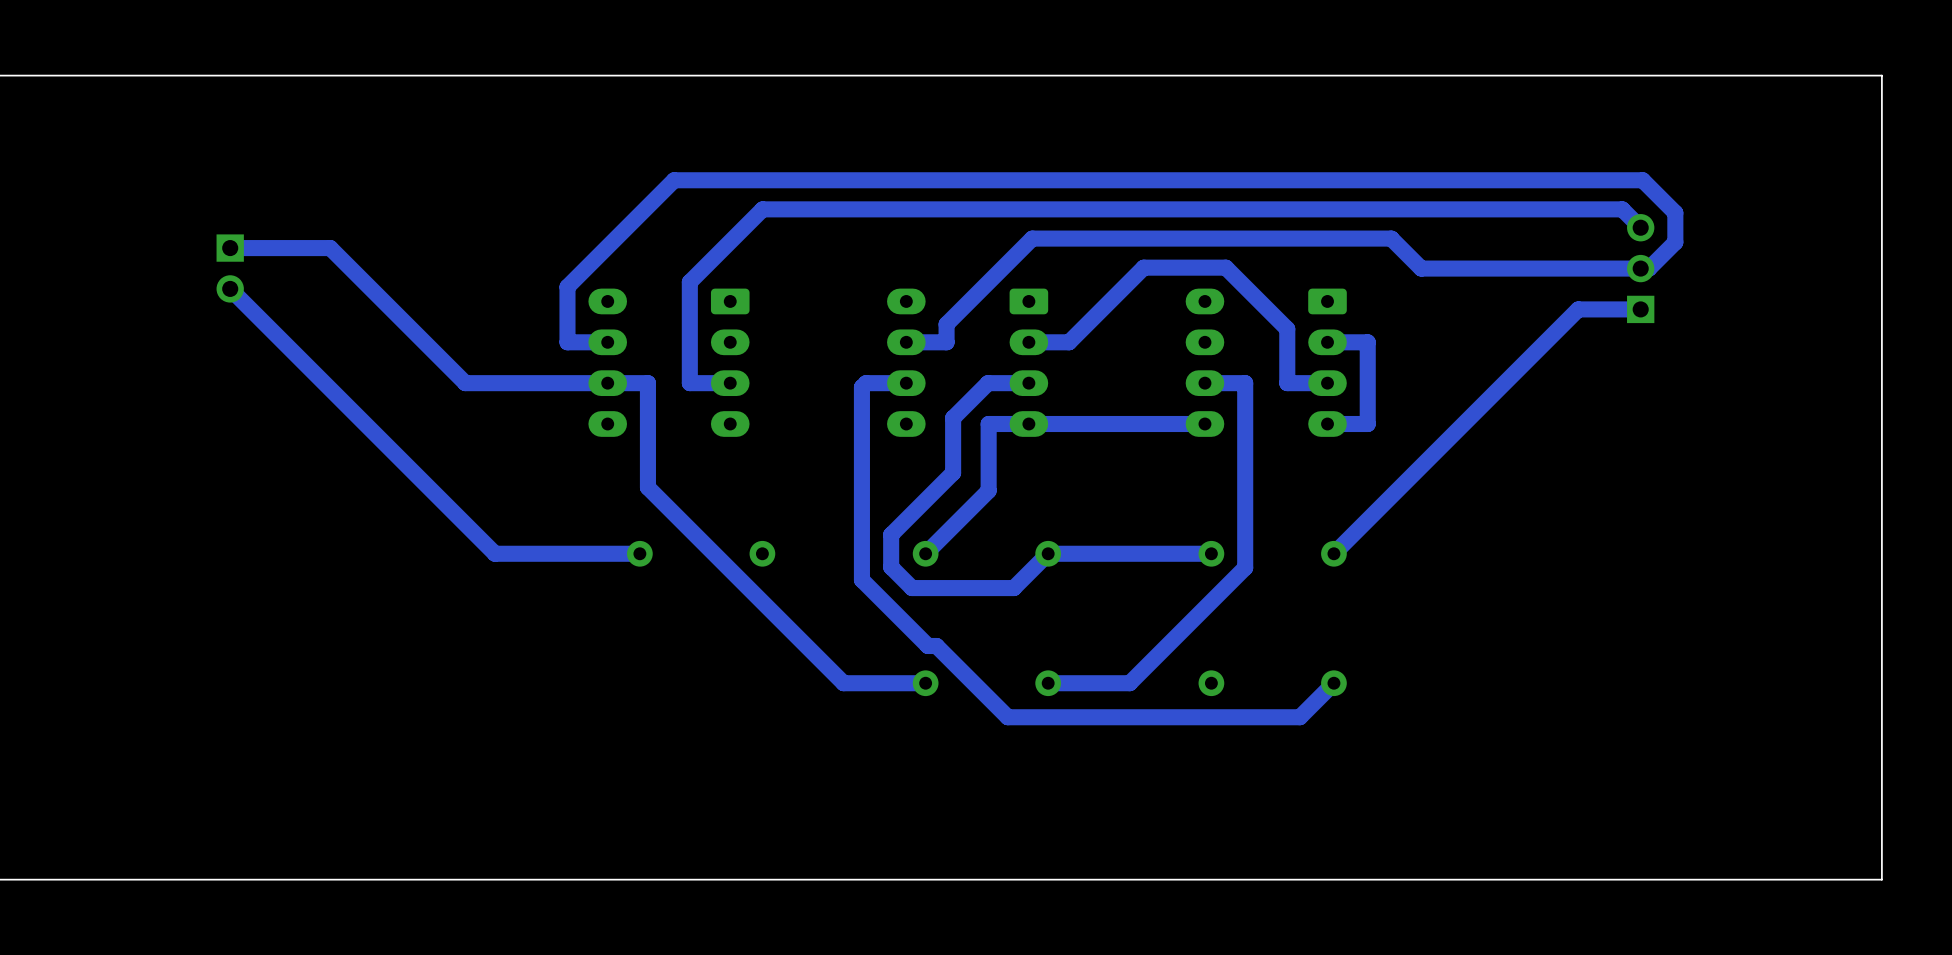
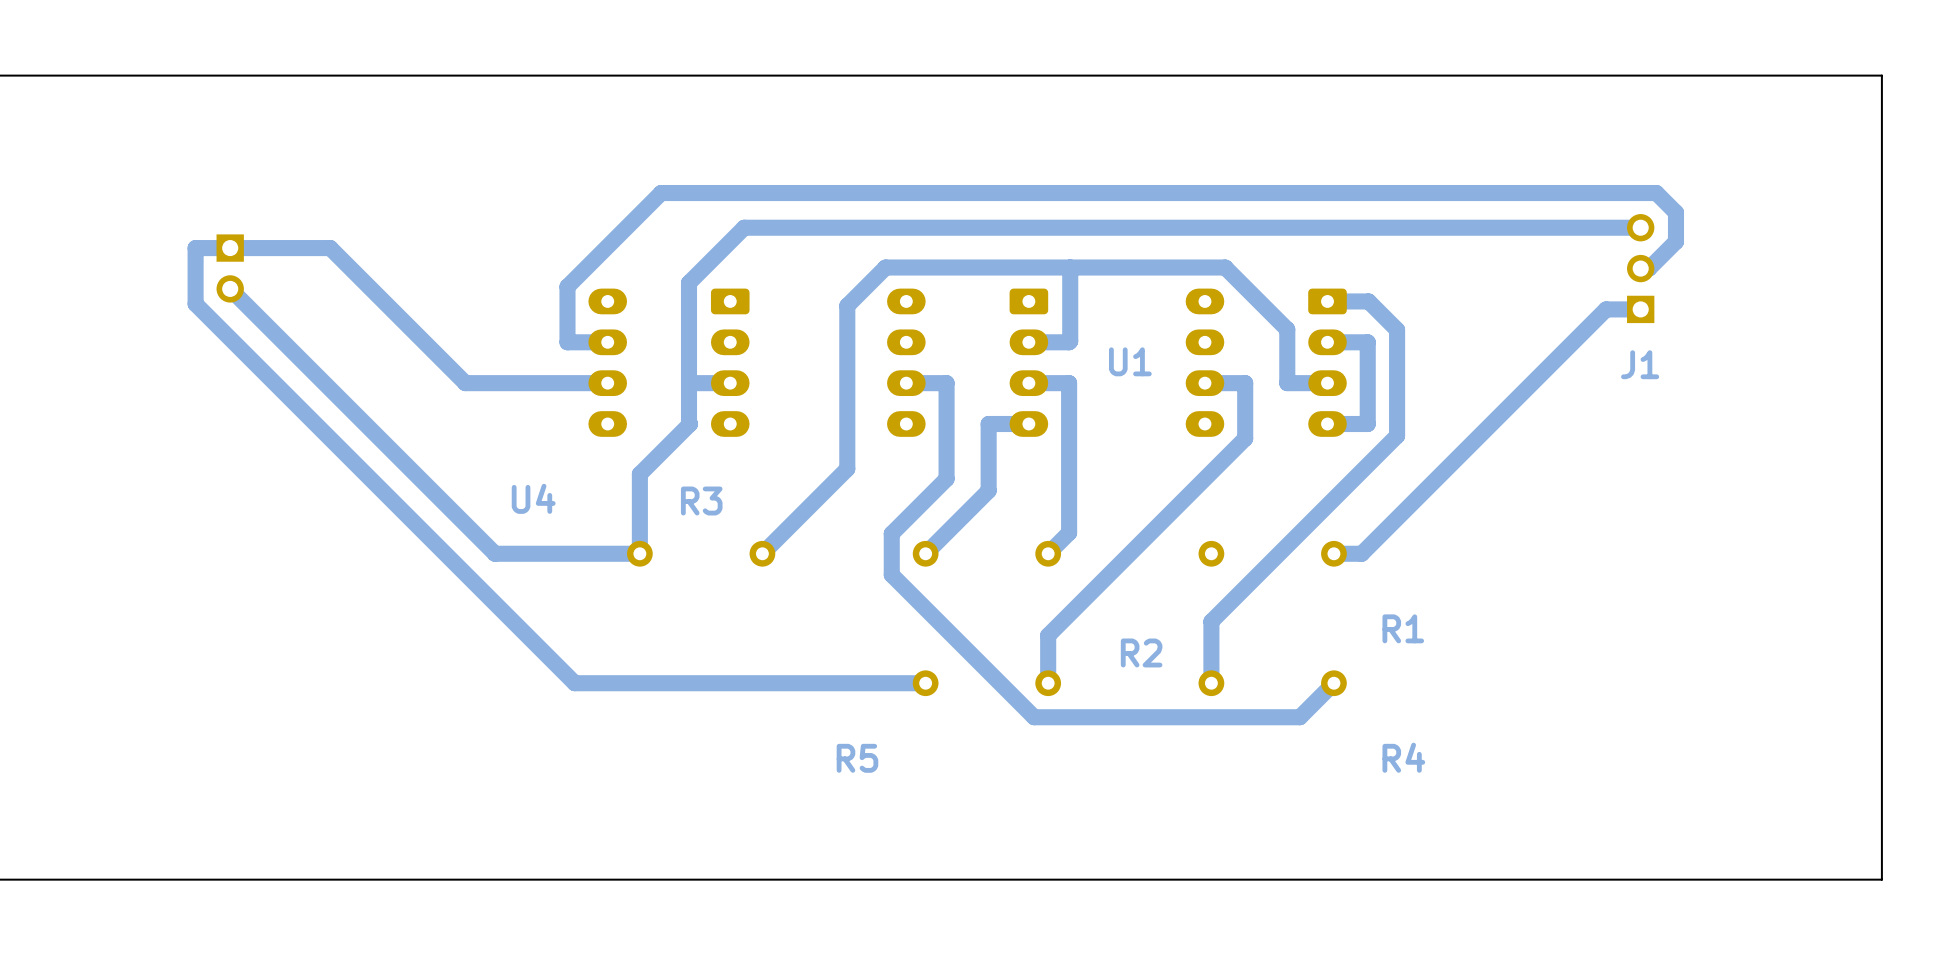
bottom track: (1640, 227) (1622, 209) (762, 209) (689, 282) (689, 382) -> (1640, 227) (744, 227) (689, 282) (690, 423) (639, 474) (639, 553)
bottom track: (1675, 242) (1675, 212) (1642, 180) (674, 180) (567, 286) -> (1675, 242) (1675, 212) (1656, 193) (661, 193) (567, 286)
bottom track: (1640, 268) (1421, 268) (1391, 238) (1032, 238) (946, 324) (946, 342) (906, 342) -> none
bottom track: none -> (1327, 301) (1368, 301) (1397, 329) (1397, 435) (1211, 621) (1211, 683)
bottom track: (1606, 309) (1578, 309) (1333, 553) -> (1606, 309) (1361, 553) (1333, 553)
bottom track: (1287, 329) (1225, 267) (1143, 267) (1070, 341) -> (1070, 267) (1070, 341)
bottom track: none -> (1287, 329) (1225, 267) (885, 267) (847, 305) (847, 468) (762, 553)
text: none -> U1 (1130, 361)
text: none -> J1 (1640, 364)
bottom track: (607, 383) (647, 383) (647, 487) (843, 683) -> (230, 248) (195, 248) (195, 304) (574, 683) (843, 683)
bottom track: (906, 383) (866, 383) (861, 387) (861, 579) (927, 645) (936, 645) (1007, 717) (1034, 717) -> (906, 383) (946, 383) (946, 478) (891, 533) (891, 574) (1034, 717)
bottom track: (1028, 383) (988, 383) (953, 418) (953, 472) (891, 534) (891, 567) (912, 588) (1013, 588) (1048, 553) (1211, 553) -> (1028, 383) (1069, 383) (1069, 532) (1048, 553)
bottom track: (1204, 423) (1028, 423) -> none
bottom track: (1245, 438) (1245, 567) (1129, 683) (1048, 683) -> (1245, 438) (1048, 635) (1048, 683)
text: none -> U4 (533, 498)
text: none -> R3 (701, 501)
text: none -> R1 (1403, 628)
text: none -> R2 (1141, 652)
text: none -> R5 (857, 758)
text: none -> R4 (1403, 757)

